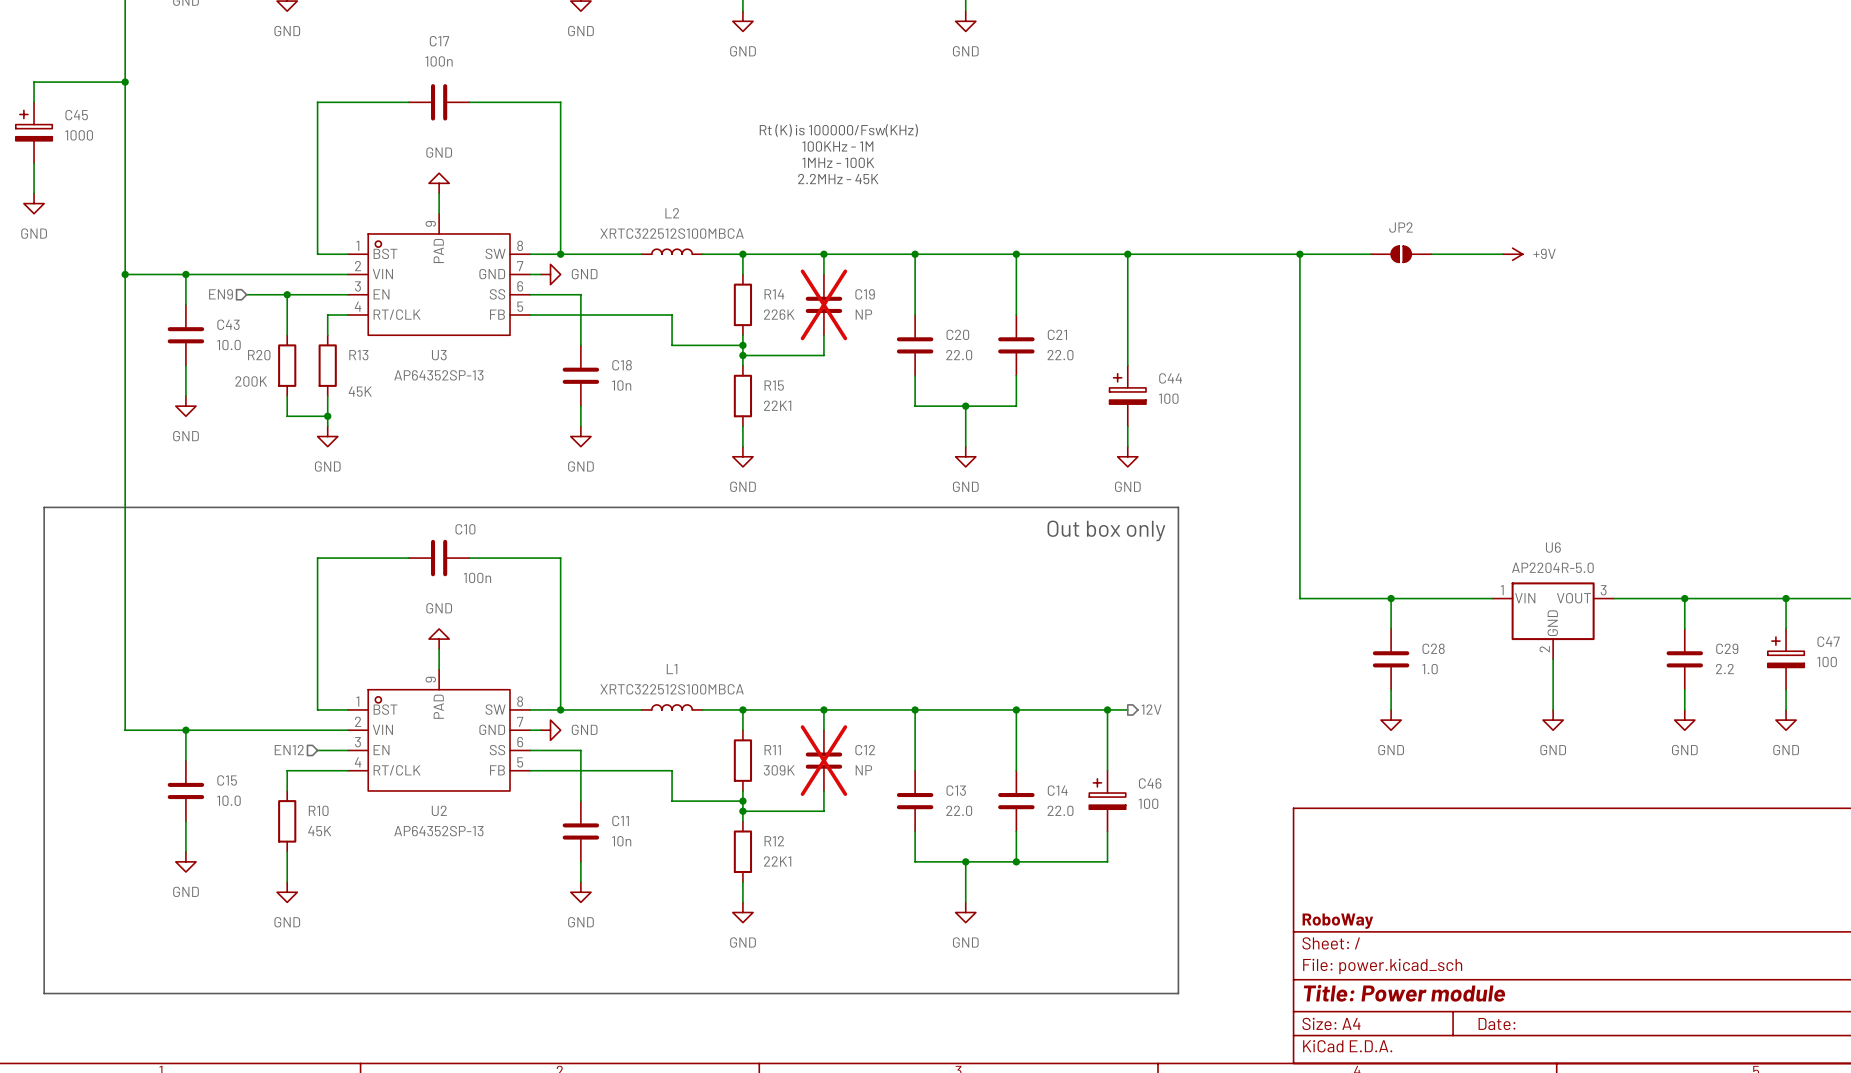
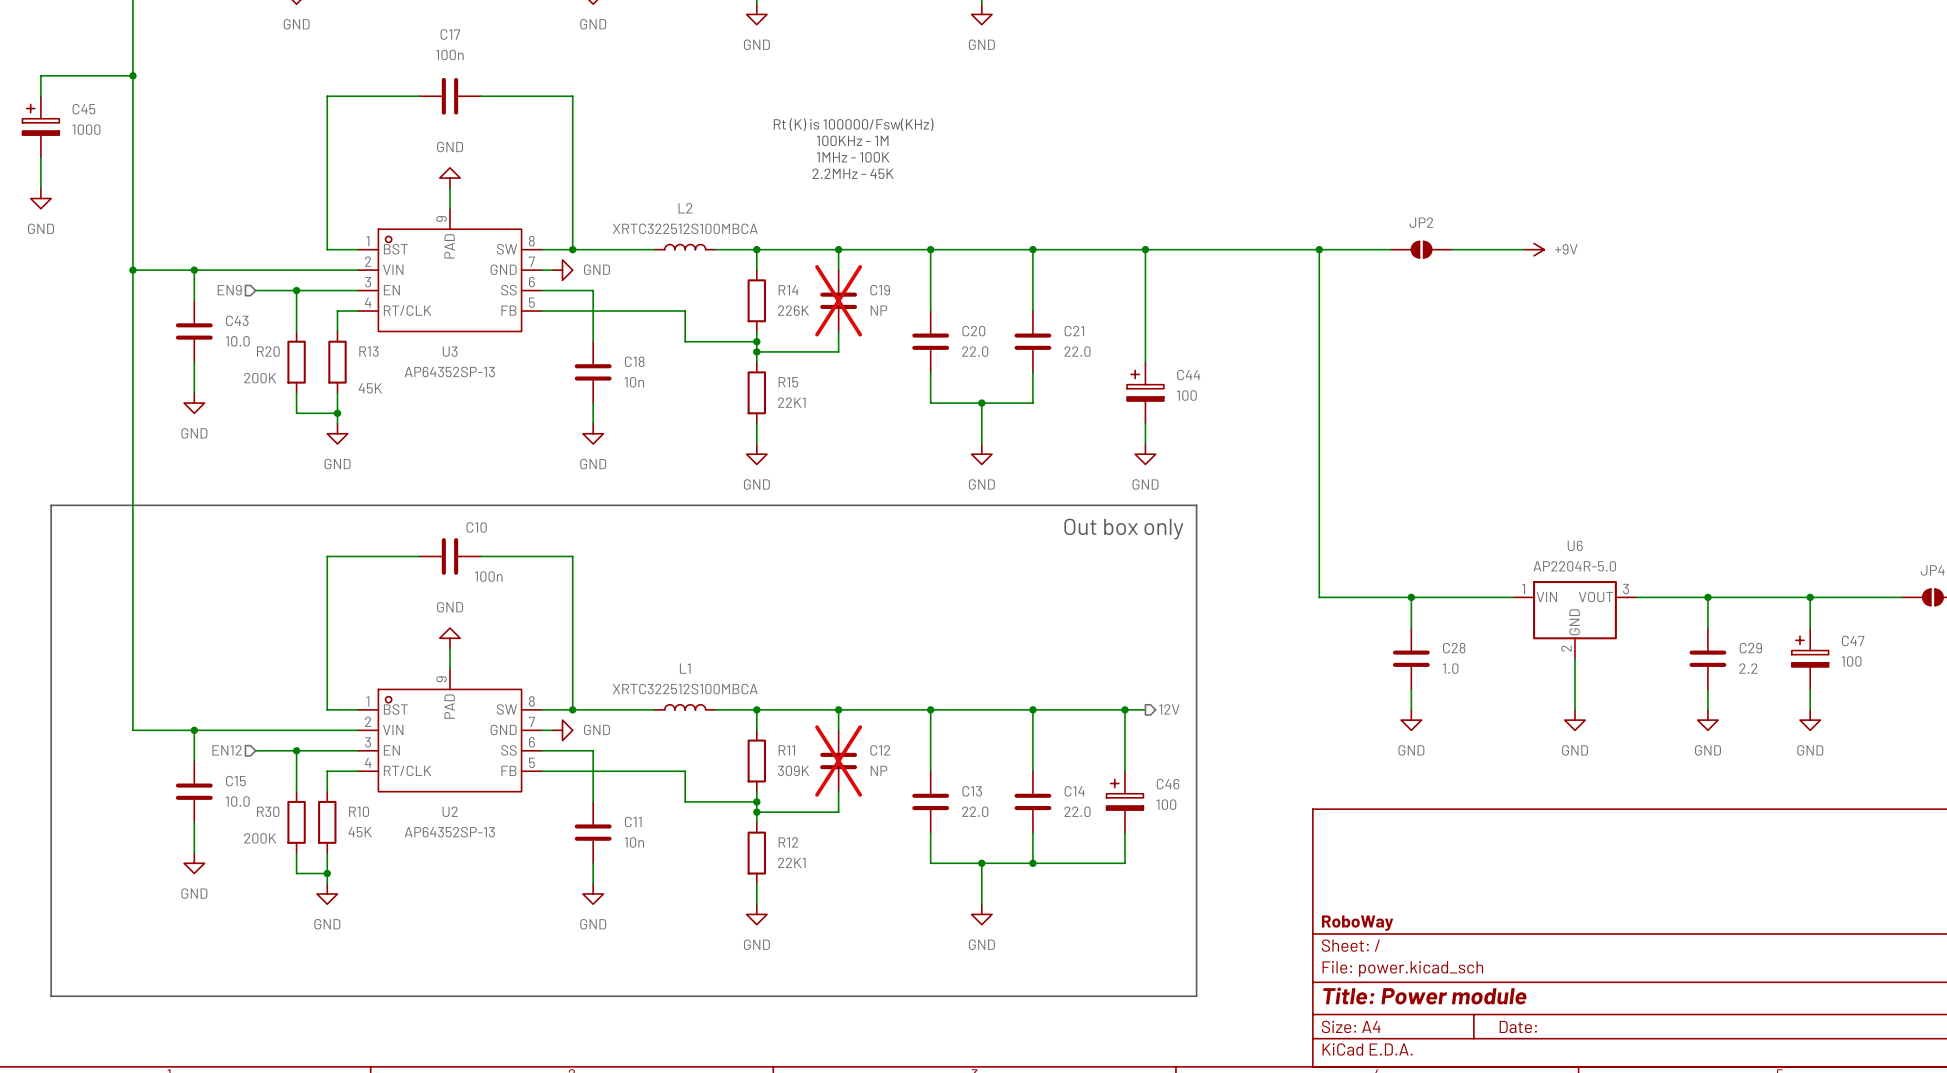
wire: none -> (255, 750) (327, 750)
junction: none -> (296, 750)
hierarchical label position: EN12 (289, 750) -> EN12 (227, 750)
wire: (287, 770) (317, 770) -> (296, 771) (296, 750)
wire: none -> (327, 771) (327, 791)
R10 name: R10 (318, 810) -> R30 (268, 811)
R10: none -> 45K (327, 822)
R10 value: 45K (319, 831) -> 200K (260, 838)
wire: none -> (327, 853) (327, 883)
wire: (287, 872) (287, 882) -> (296, 873) (327, 873)
junction: none -> (327, 873)
power symbol position: GND (287, 892) -> GND (327, 893)

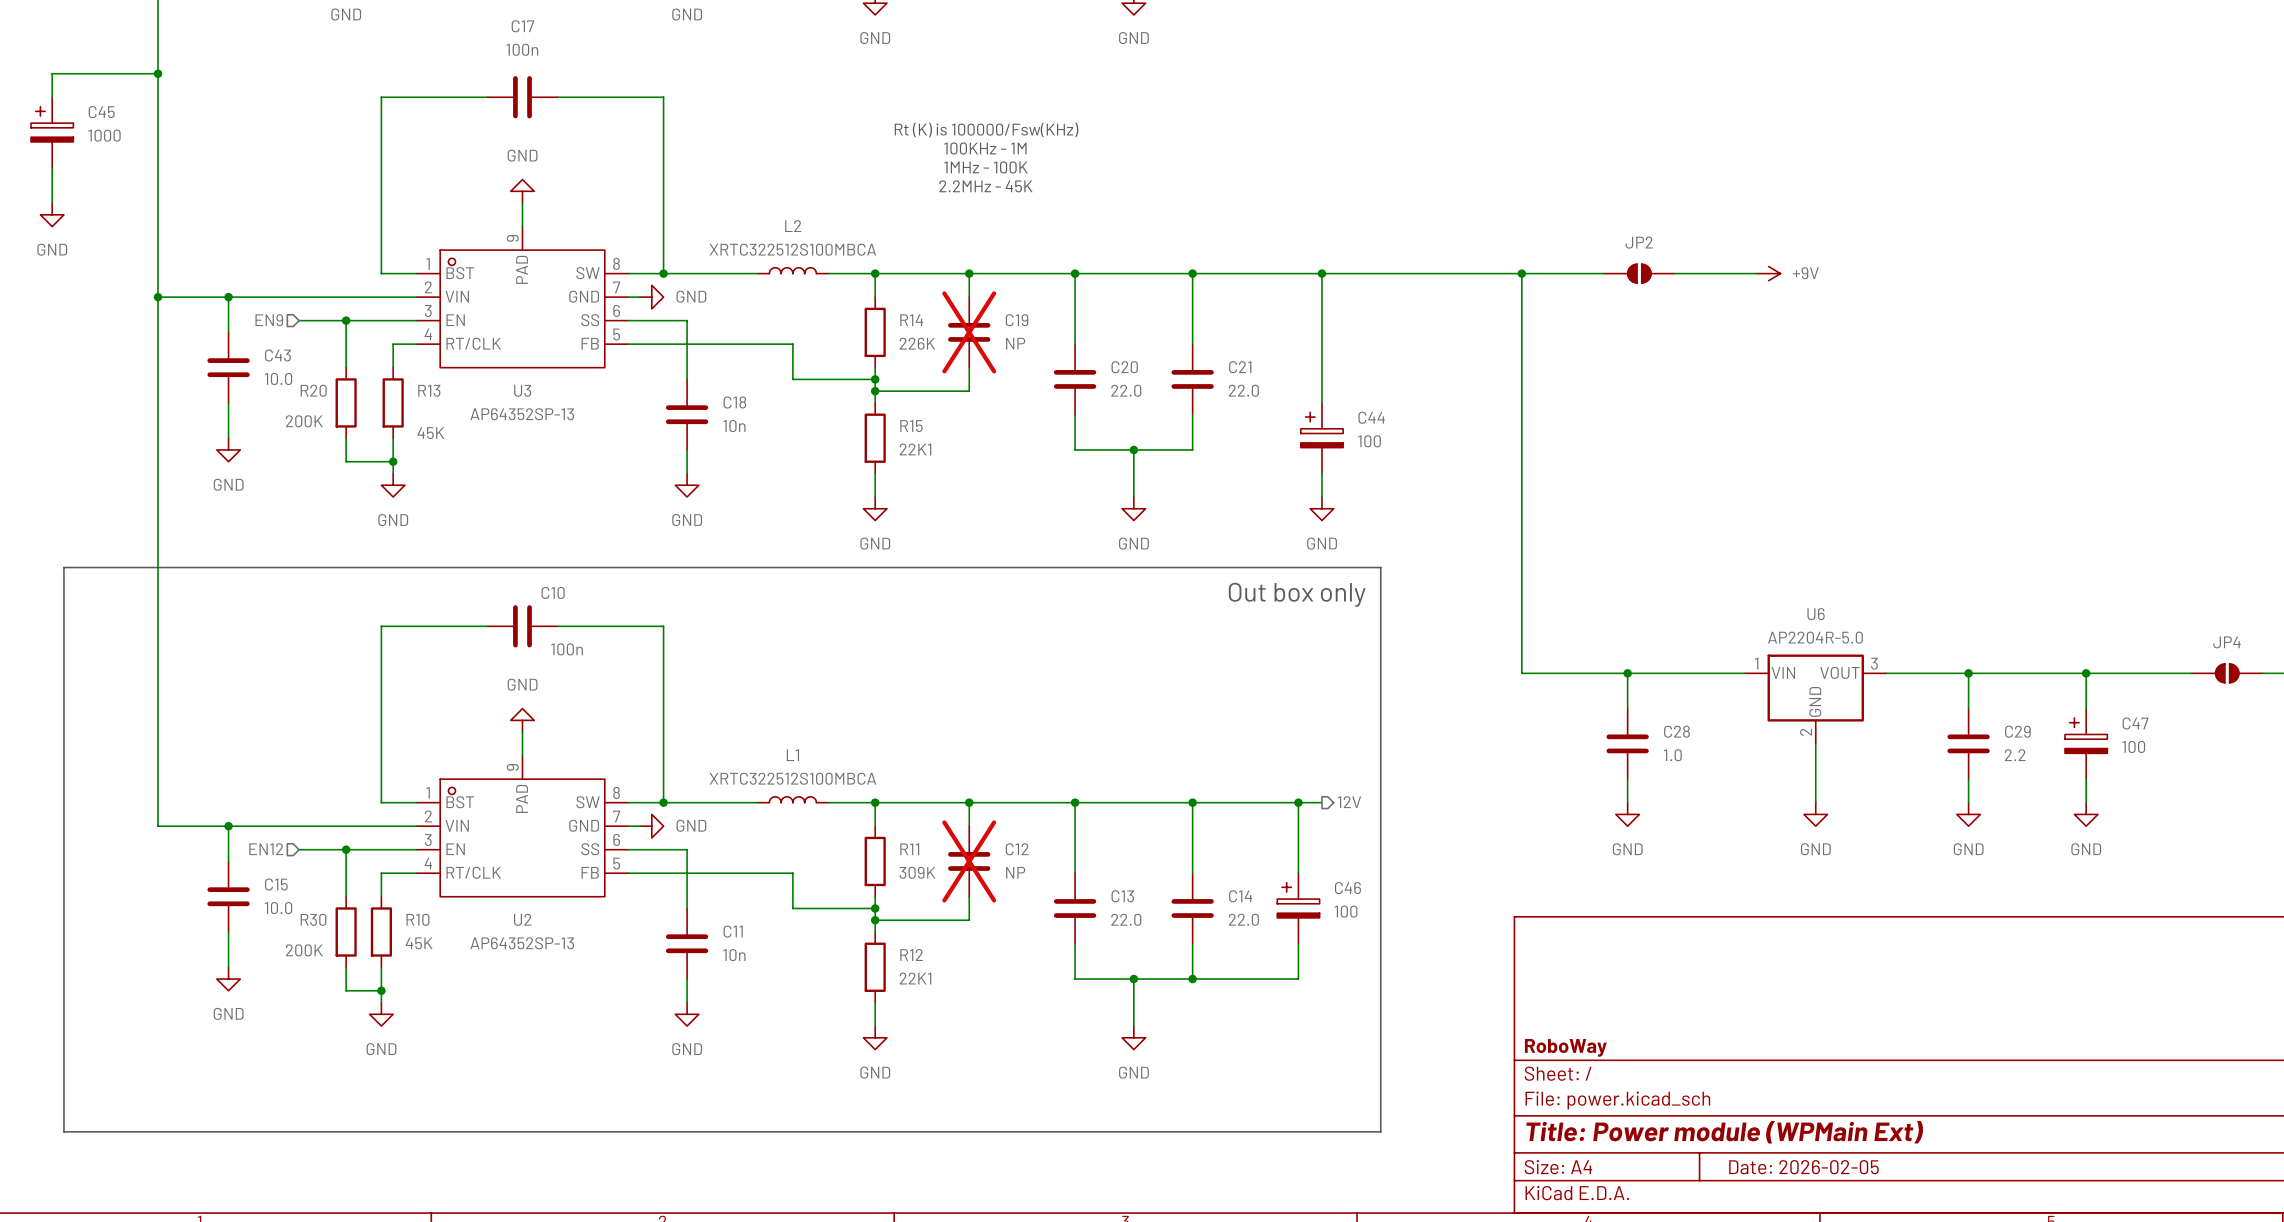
title block: Title: Power module (1424, 995) -> Title: Power module (WPMain Ext) (1724, 1132)
title block: Date: (1518, 1027) -> Date: 2026-02-05 (1804, 1167)

